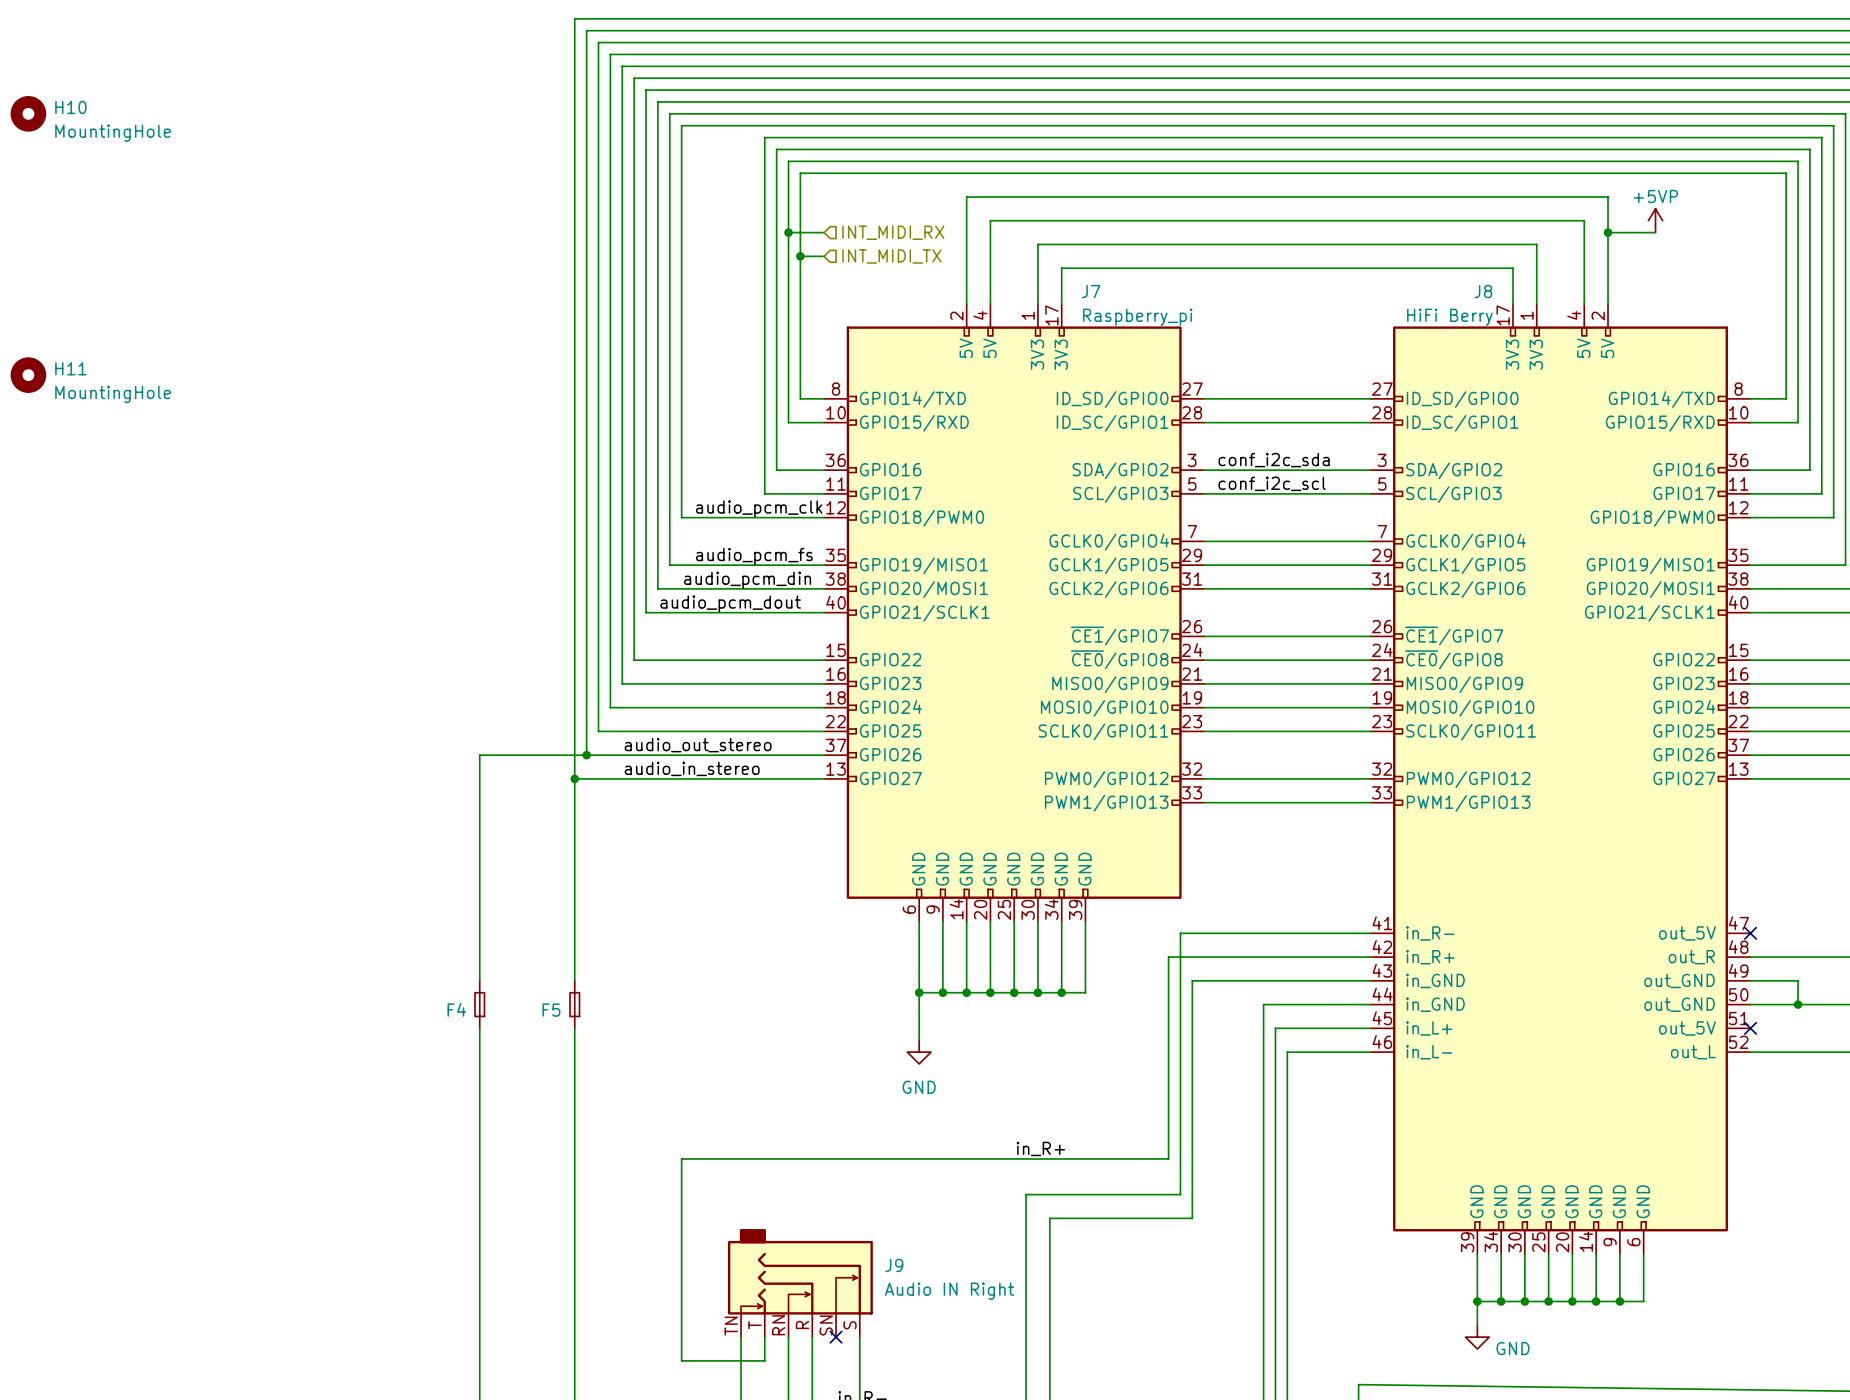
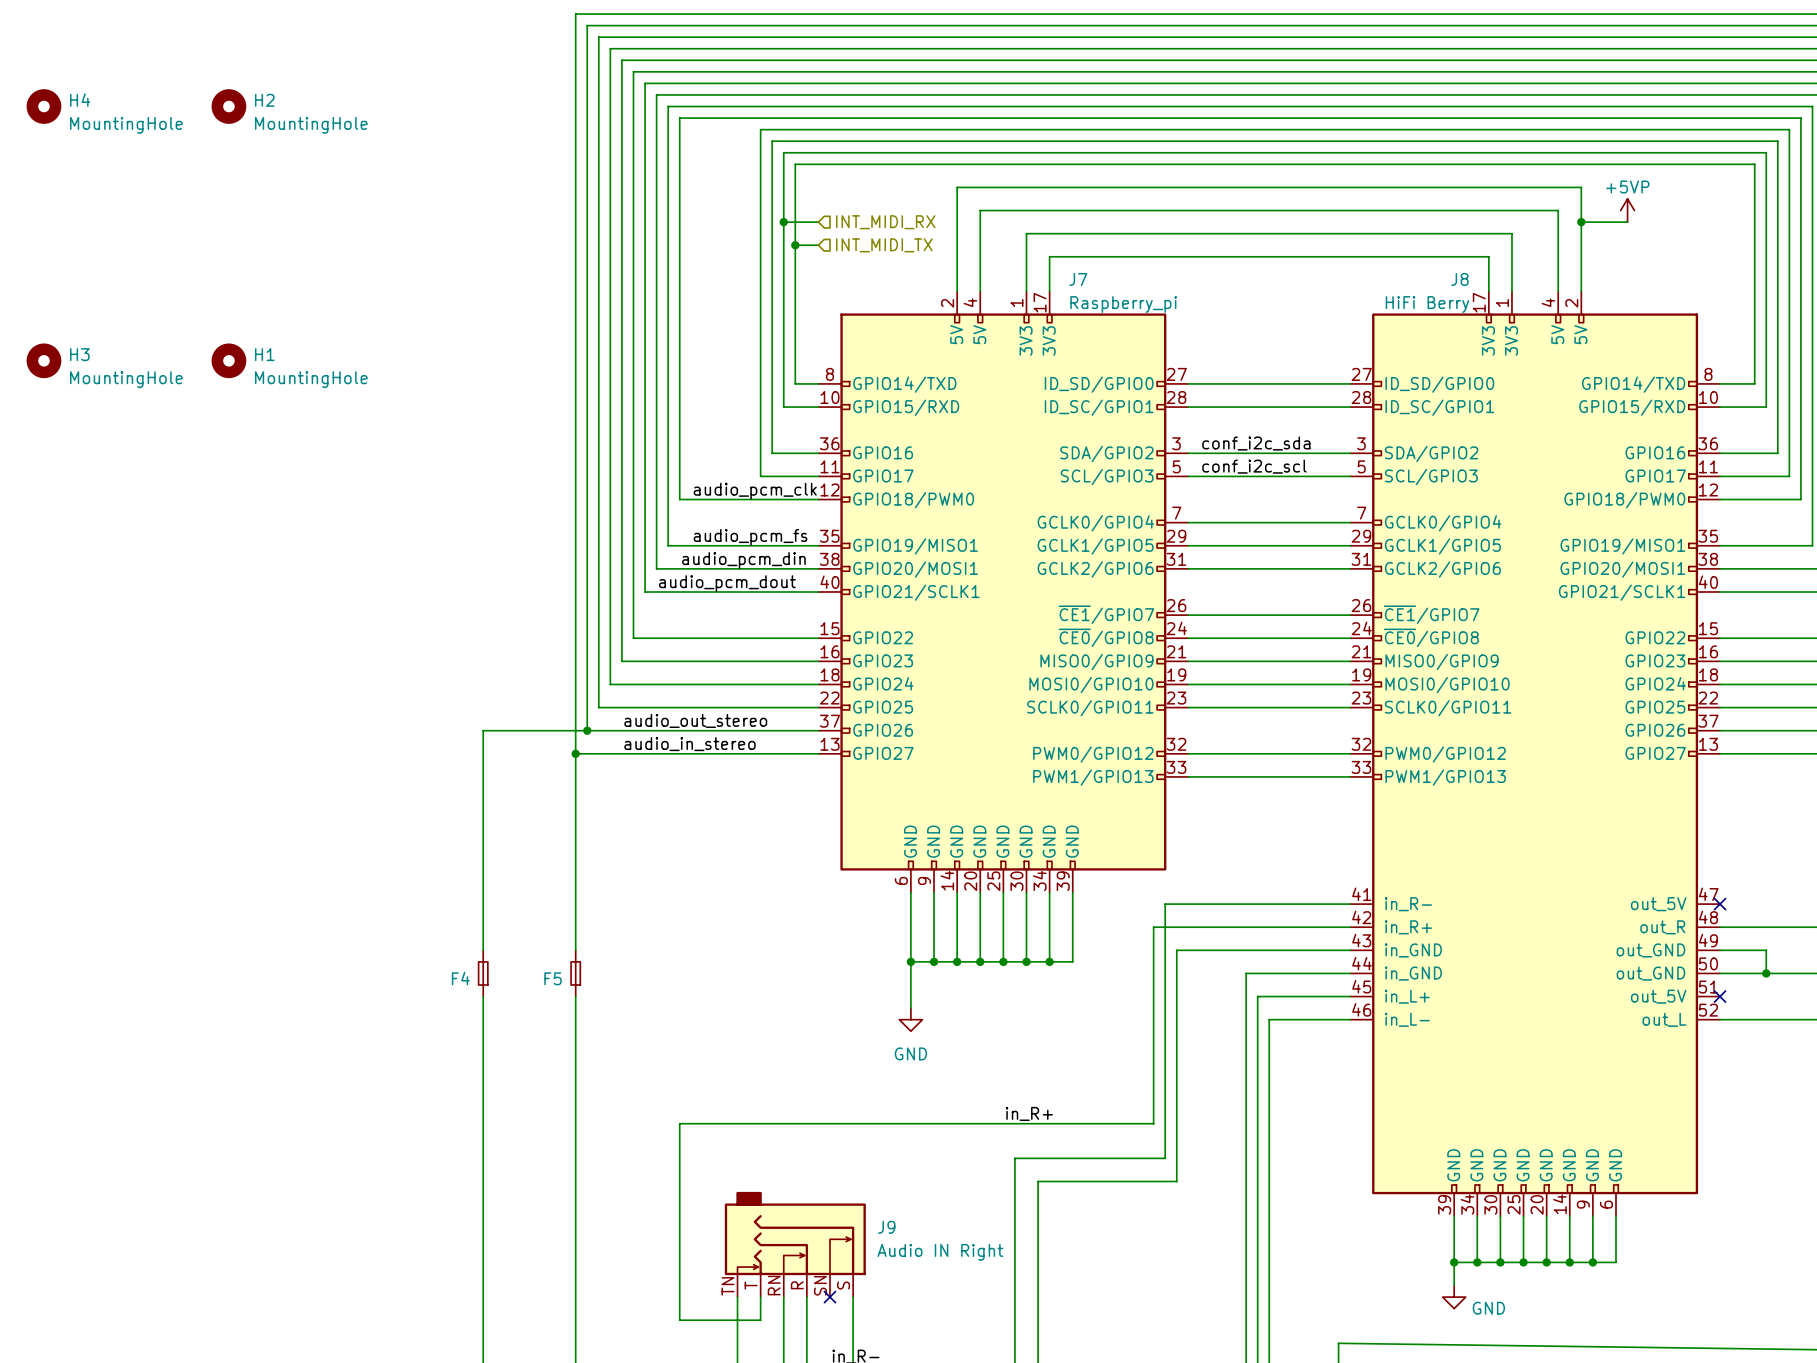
H10 name: H10 (70, 107) -> H4 (80, 100)
H2: none -> MountingHole (228, 106)
H11 name: H11 (70, 368) -> H3 (79, 354)
H1: none -> MountingHole (228, 360)

